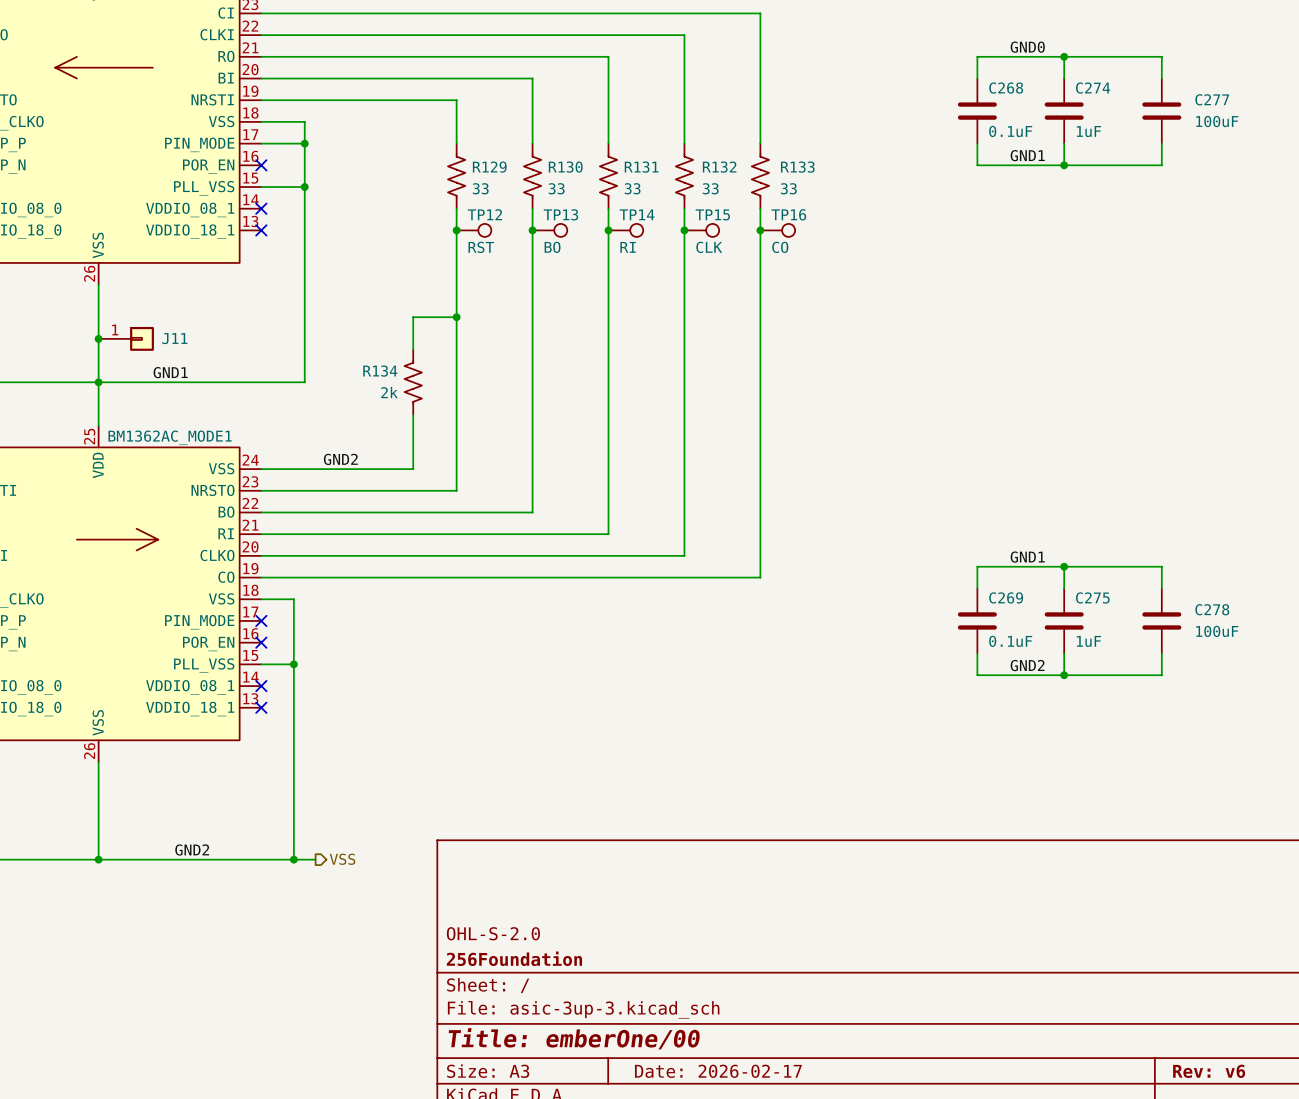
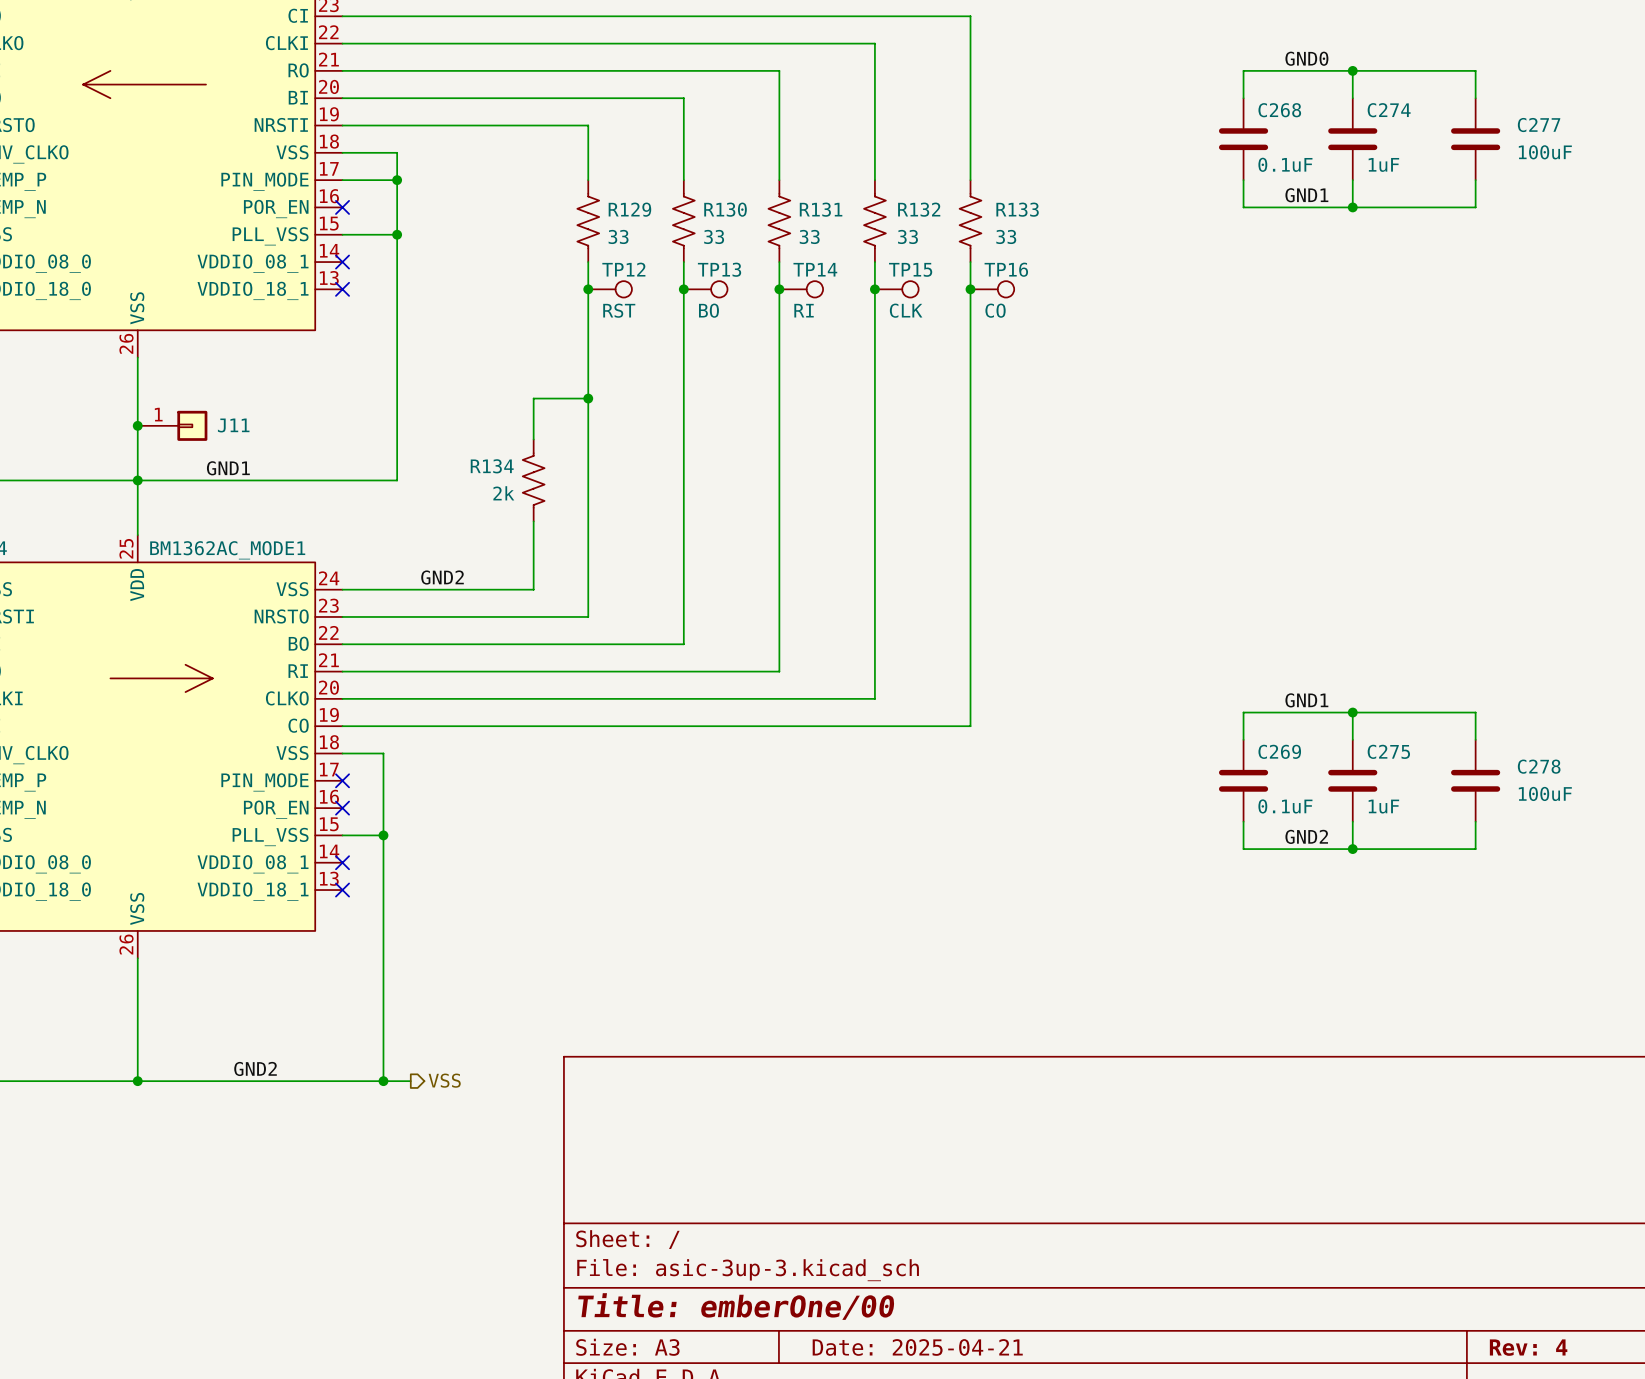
title block: OHL-S-2.0 (493, 933) -> none
title block: 256Foundation (514, 958) -> none
title block: Date: 2026-02-17 (718, 1071) -> Date: 2025-04-21 (917, 1347)
title block: Rev: v6 (1209, 1071) -> Rev: 4 (1528, 1347)

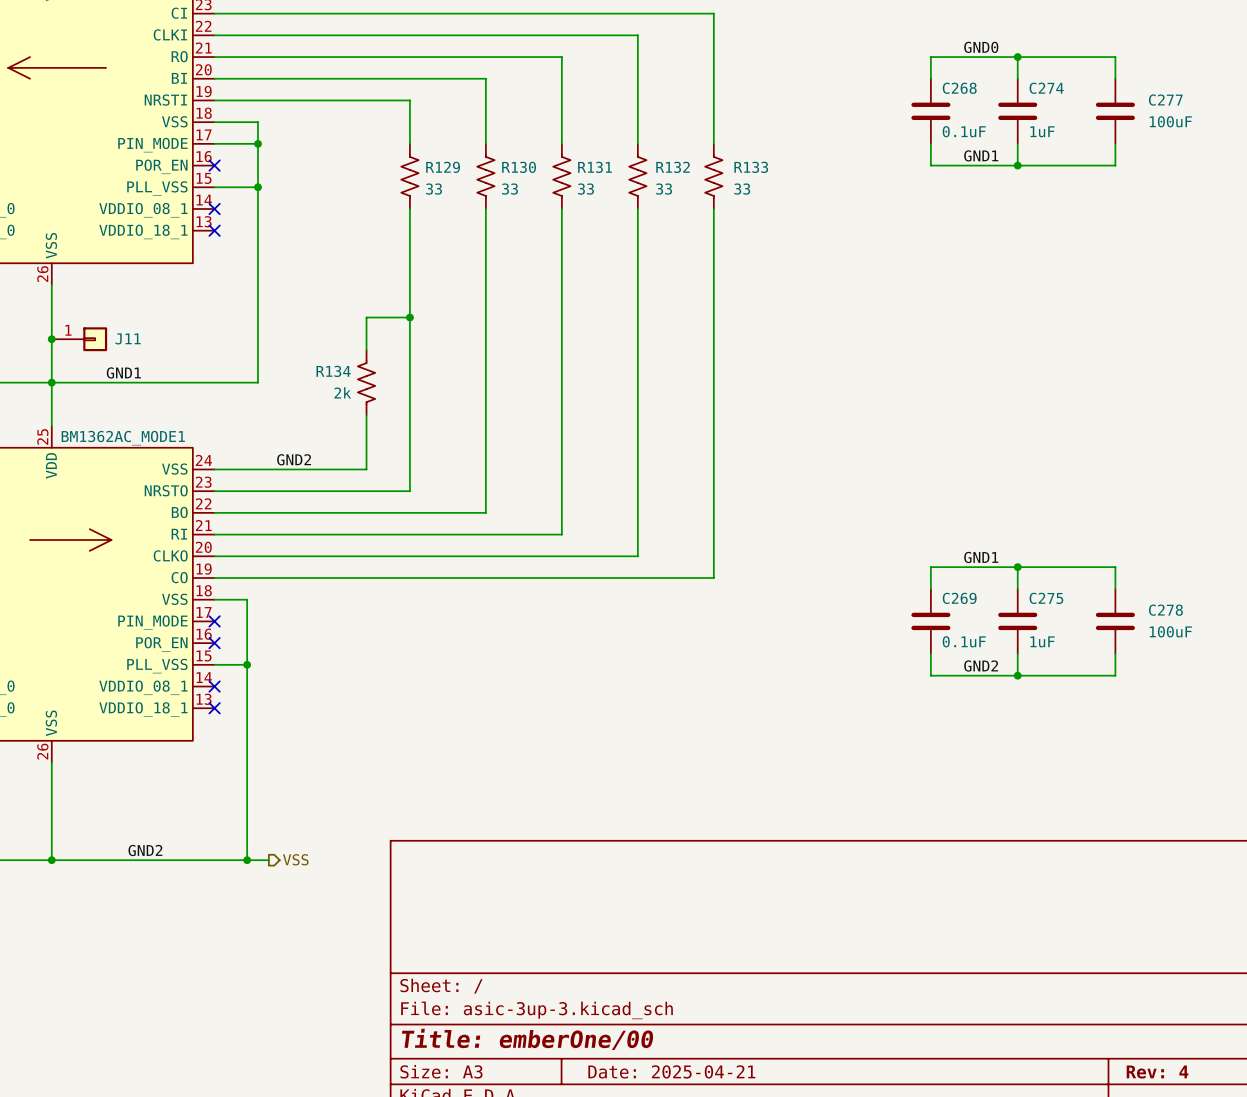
junction: (588, 289) -> none
TP12: RST (610, 289) -> none
junction: (683, 289) -> none
TP13: BO (705, 289) -> none
junction: (779, 289) -> none
TP14: RI (801, 289) -> none
junction: (874, 289) -> none
TP15: CLK (896, 289) -> none
junction: (970, 289) -> none
TP16: CO (992, 289) -> none

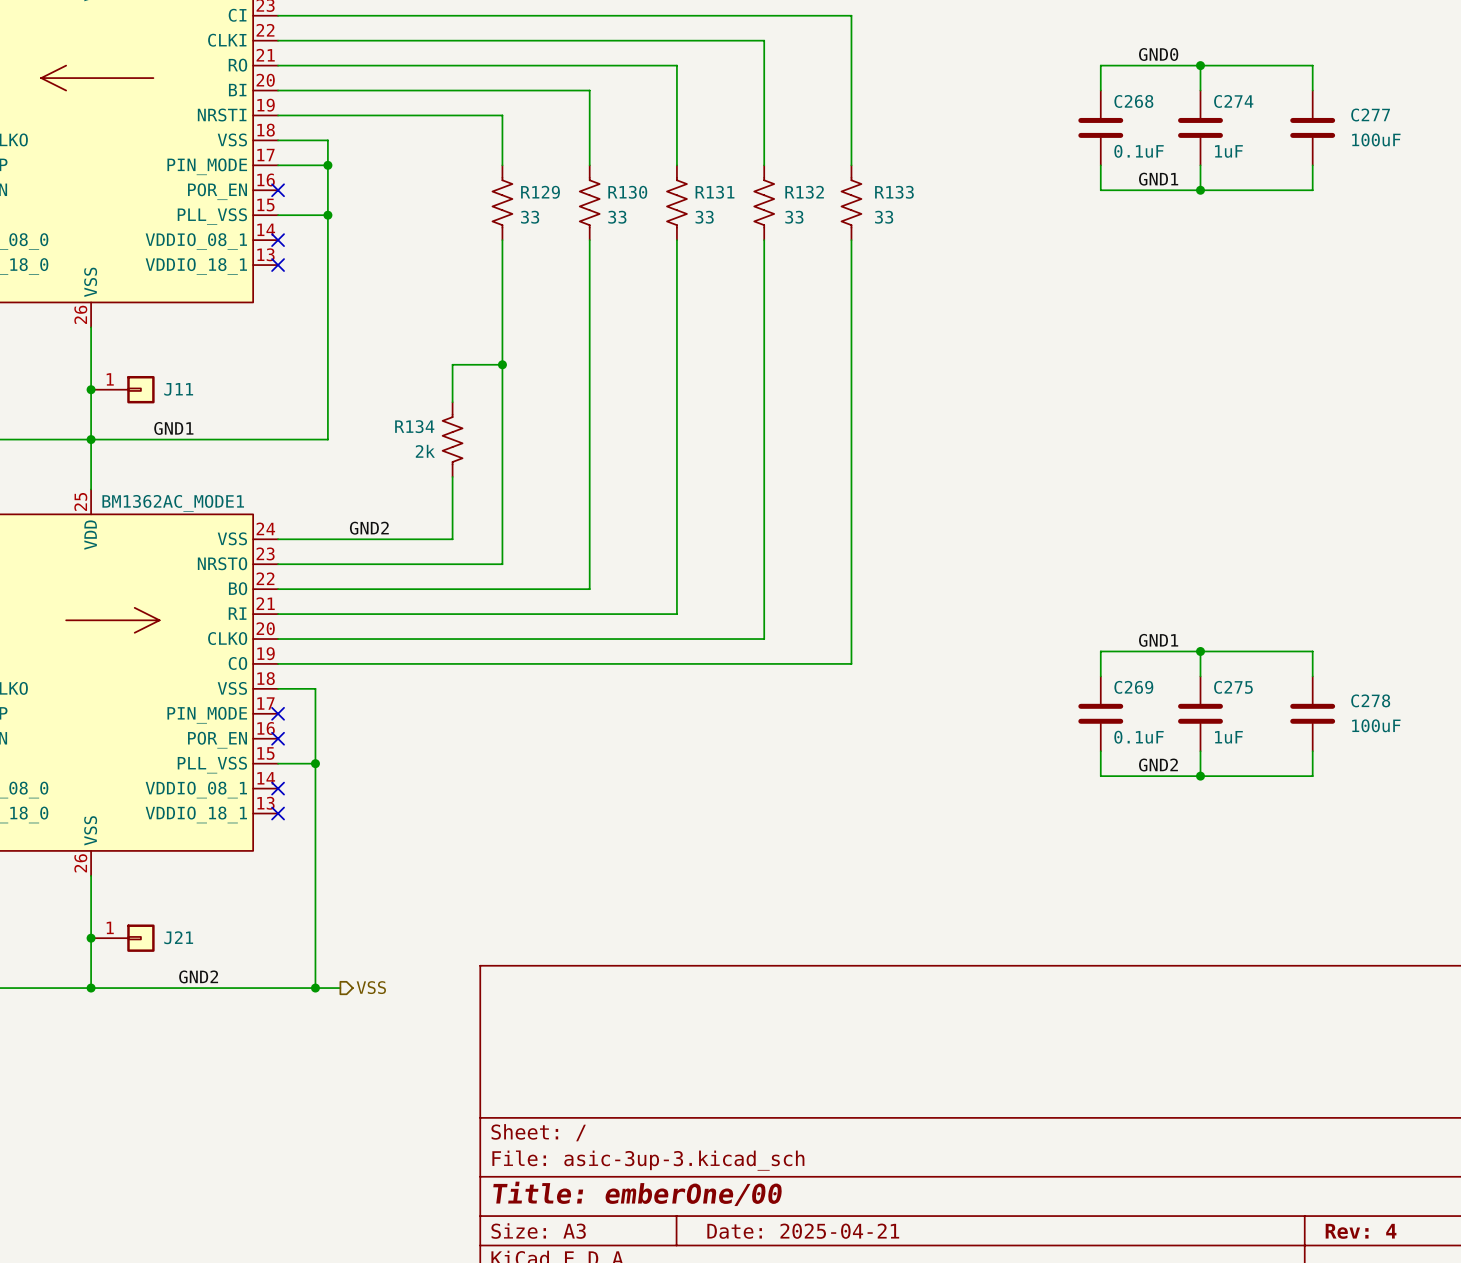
junction: none -> (91, 938)
J21: none -> (122, 938)

